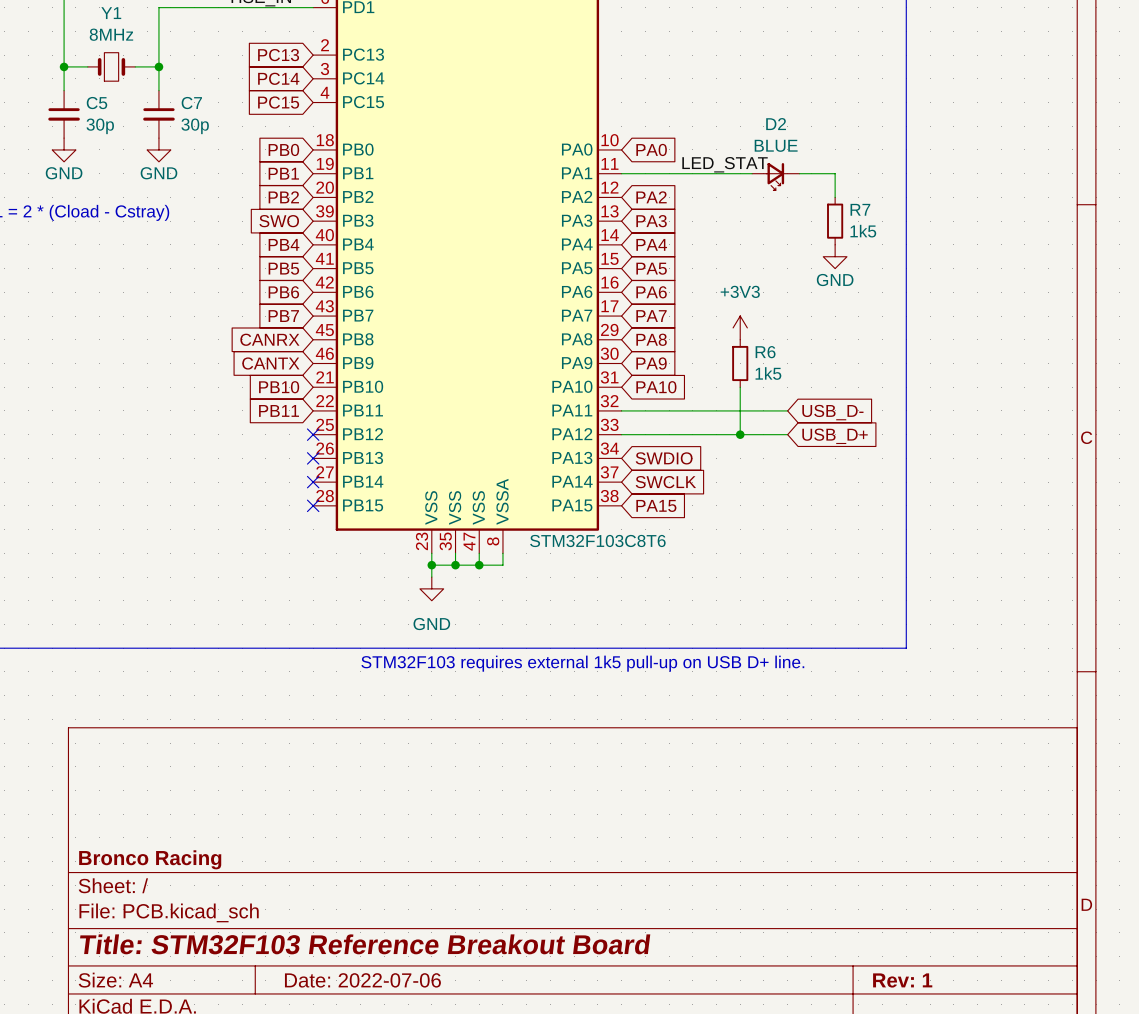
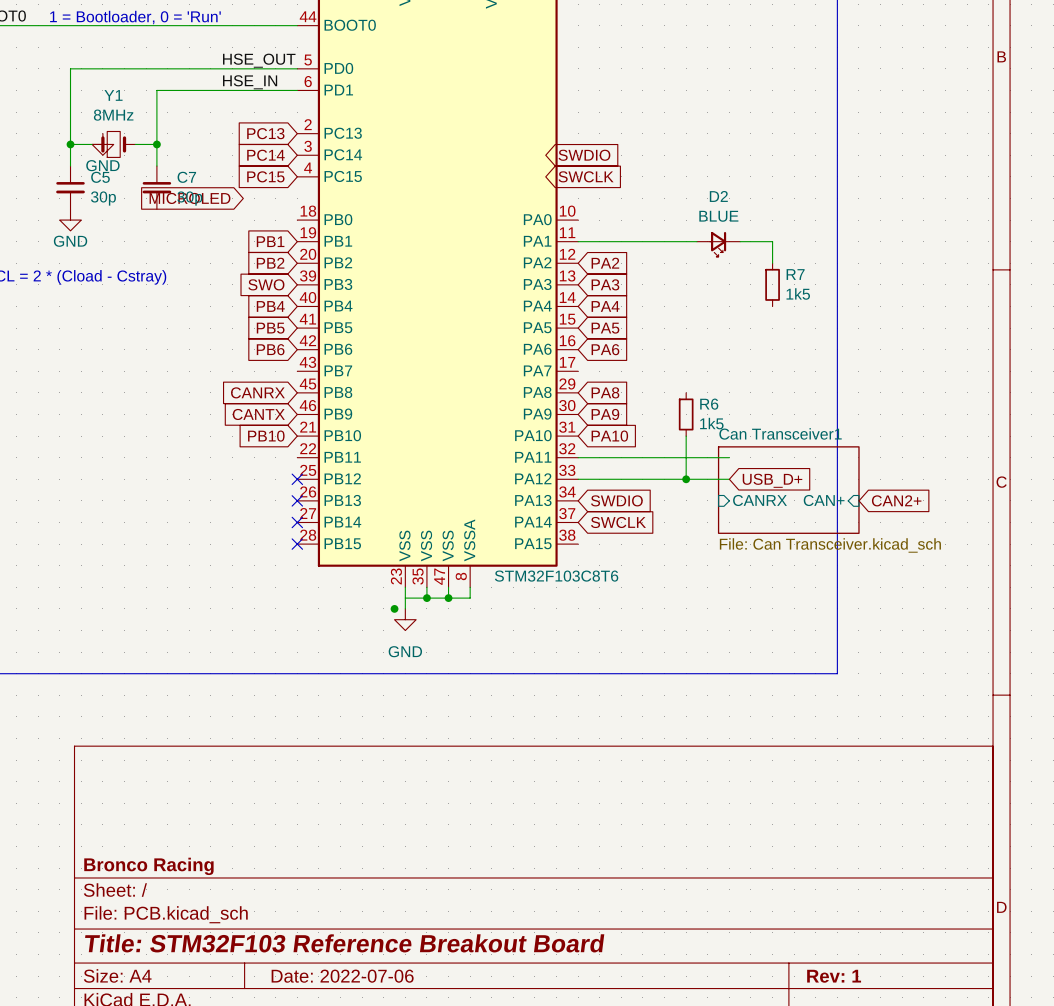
global label: none -> SWDIO (584, 155)
global label: none -> SWCLK (586, 176)
global label: none -> MICROLED (190, 198)
power symbol position: GND (158, 149) -> GND (102, 144)
global label: PB0 (283, 149) -> none
global label: PA0 (651, 149) -> none
label: LED_STAT (725, 164) -> none
power symbol: GND (835, 256) -> none
global label: PB7 (283, 316) -> none
global label: PA7 (651, 316) -> none
power symbol: +3V3 (740, 327) -> none
global label: PB11 (279, 410) -> none
global label: USB_D- (832, 412) -> none
sheet Can Transceiver1: none -> File: Can Transceiver.kicad_sch (788, 490)
sheet pin: none -> CANRX (760, 500)
sheet pin: none -> CAN+ (824, 500)
global label: none -> CAN2+ (896, 500)
global label: PA15 (656, 505) -> none
junction position: (431, 565) -> (394, 608)
text: STM32F103 requires external 1k5 pull-up on USB D+ line. (582, 663) -> none

